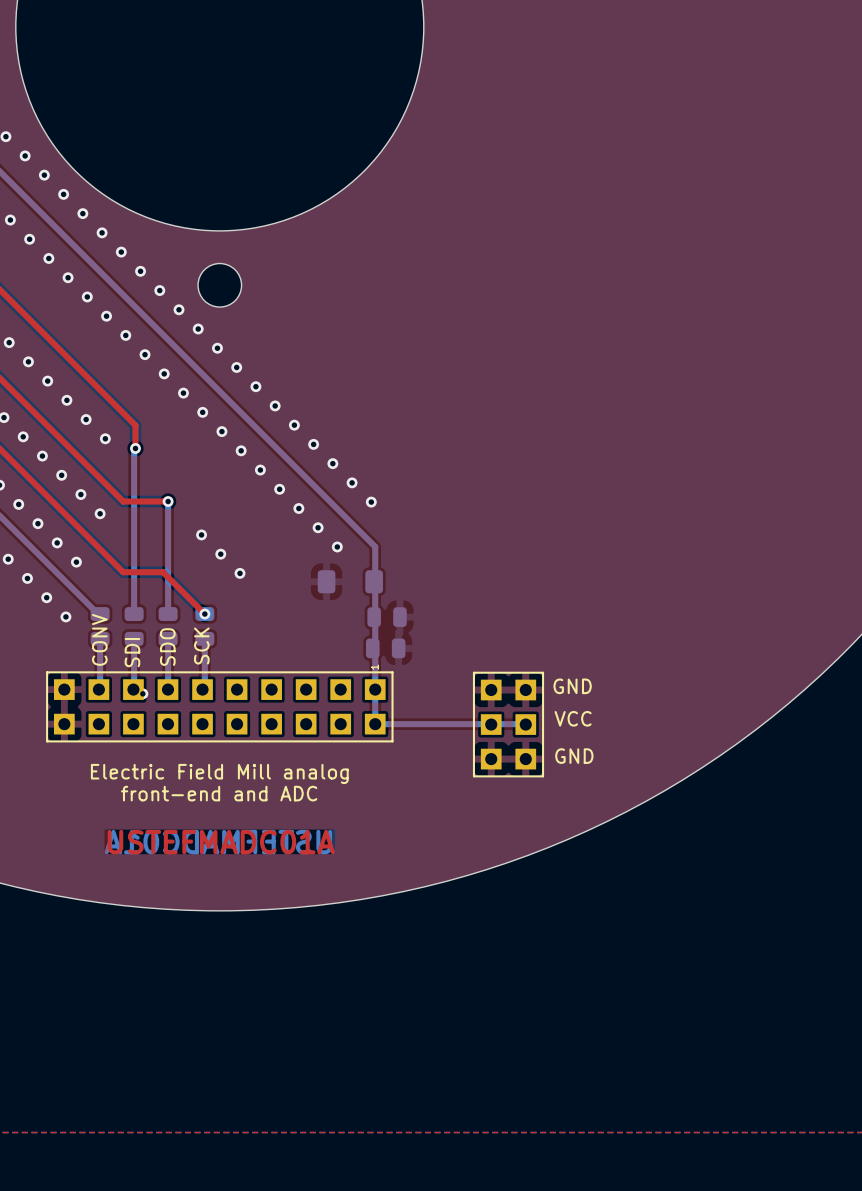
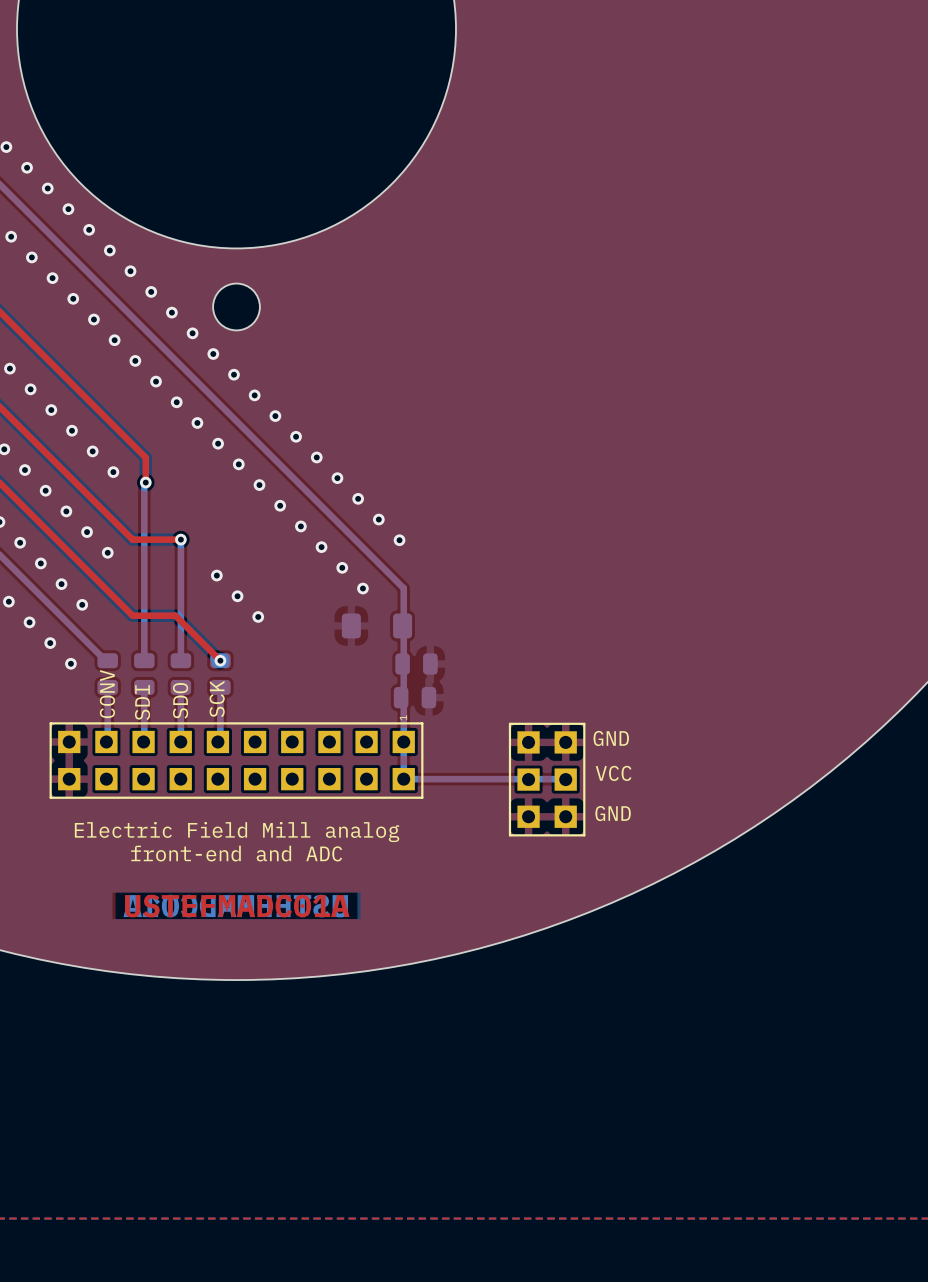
via: (142, 693) -> none

